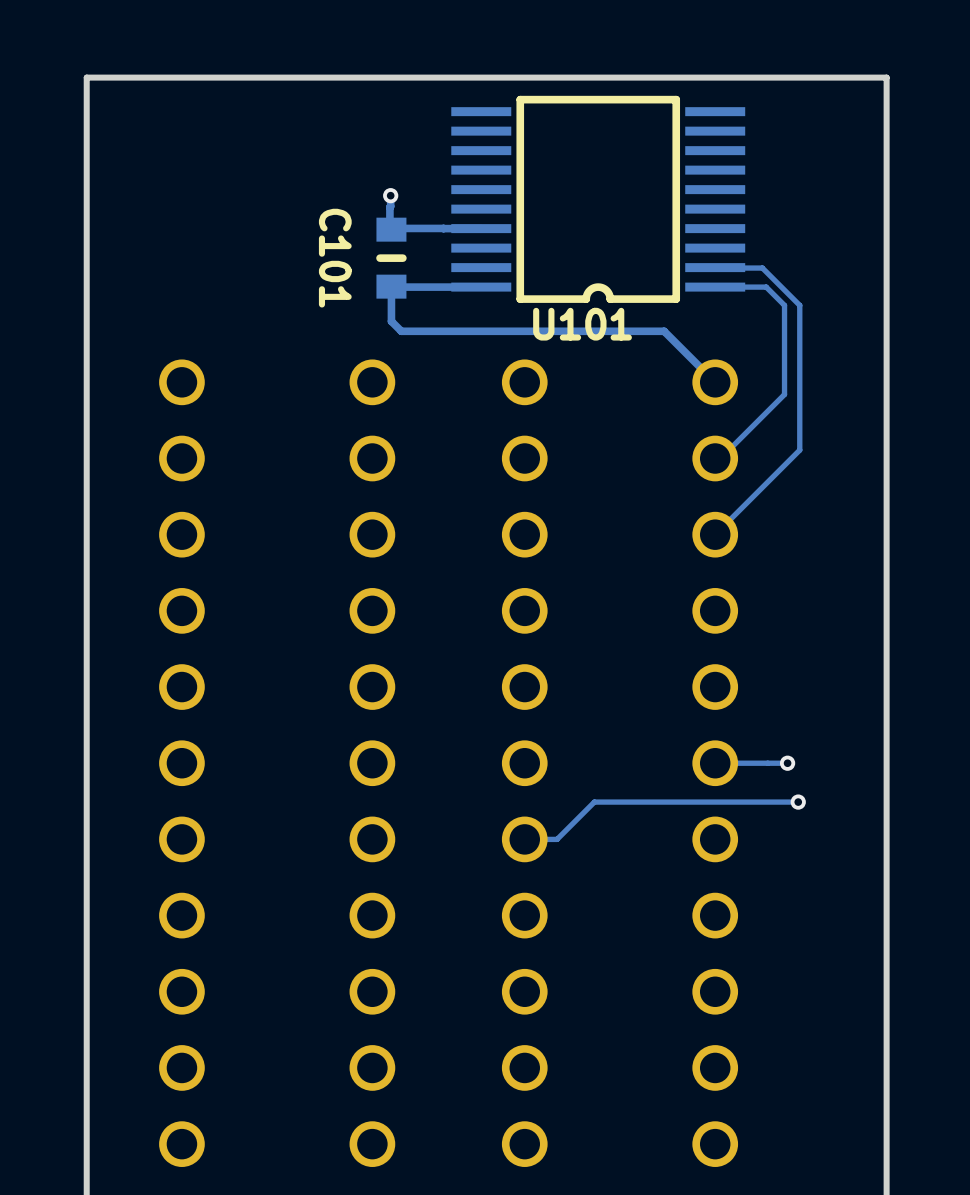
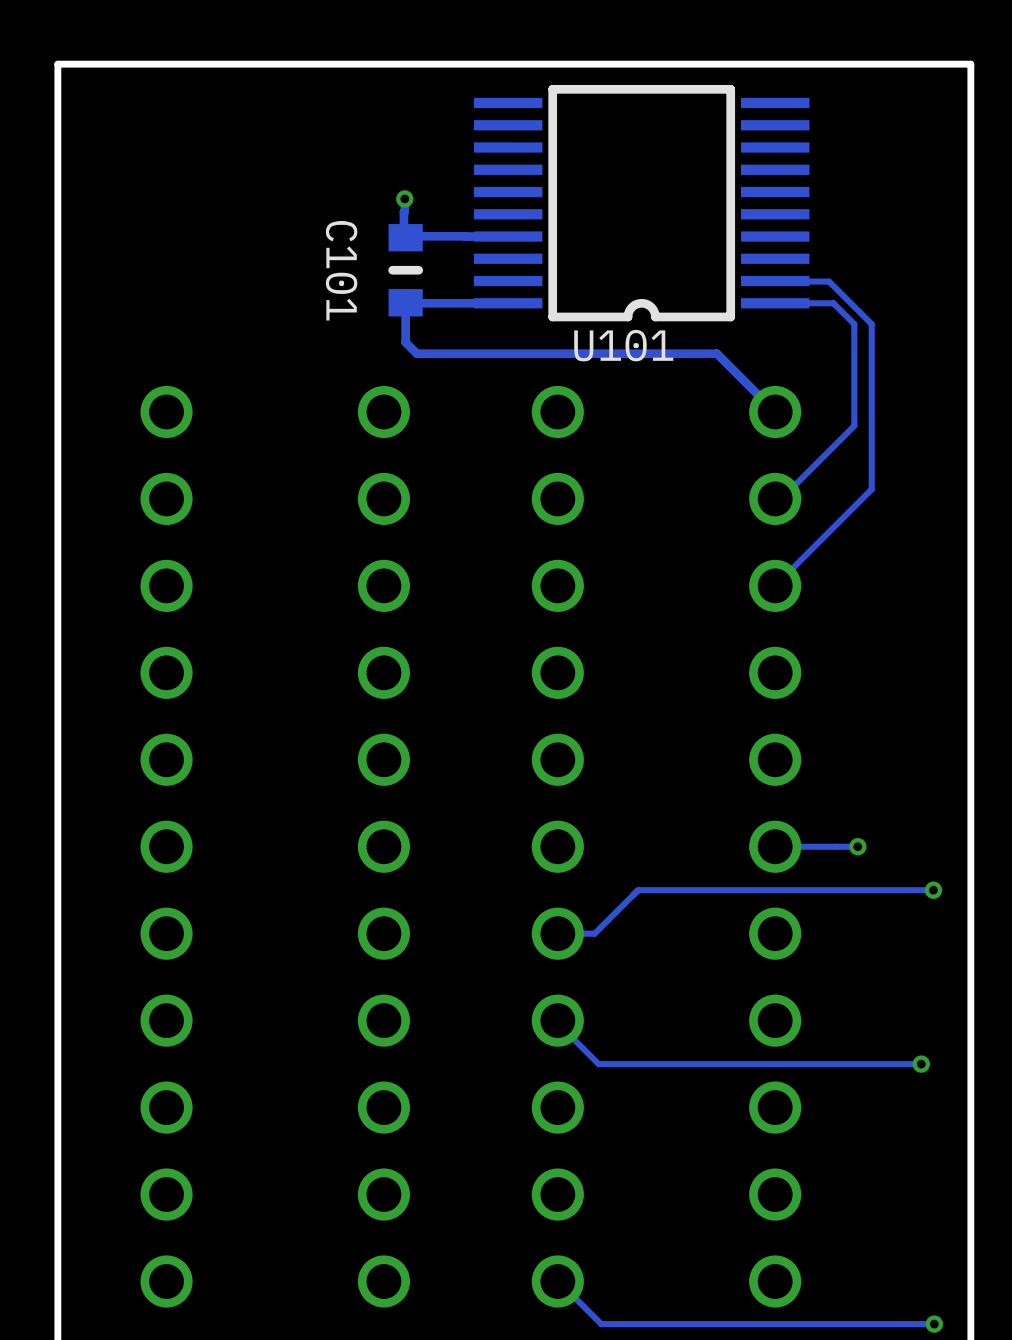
track: (798, 802) (594, 802) -> (933, 890) (637, 891)
via position: (798, 802) -> (933, 890)
track: none -> (559, 1024) (598, 1064) (921, 1064)
via: none -> (921, 1064)
track: none -> (559, 1282) (601, 1324) (934, 1324)
via: none -> (934, 1324)

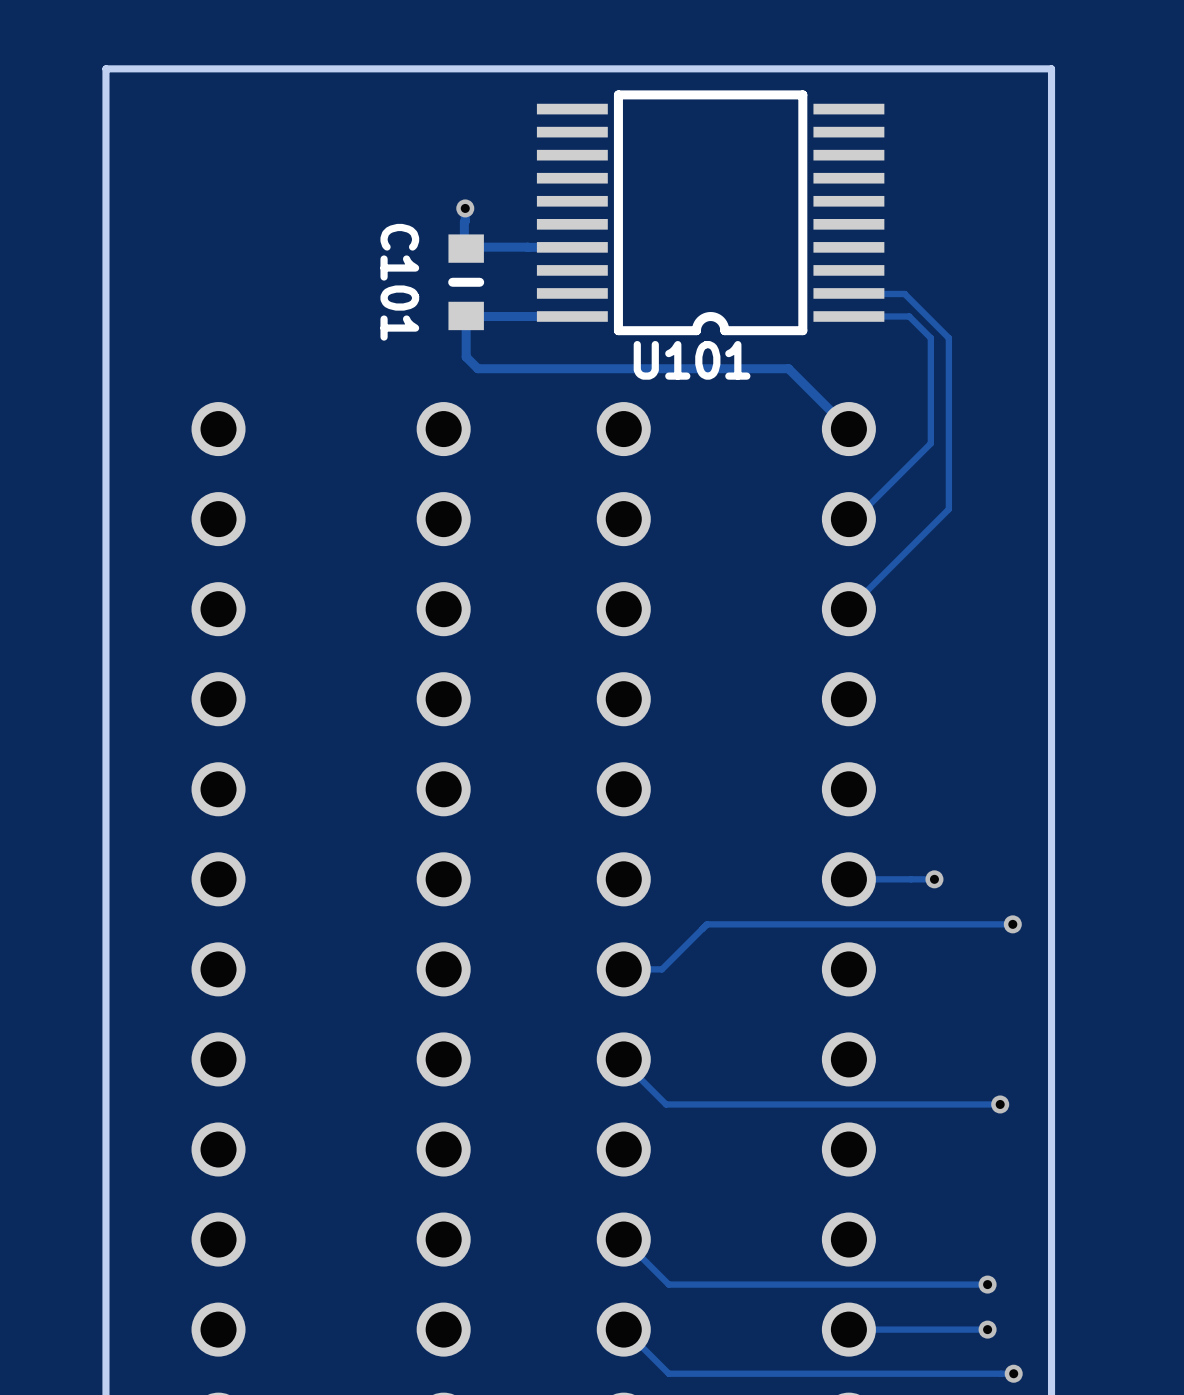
track: none -> (623, 1239) (668, 1284) (987, 1284)
via: none -> (987, 1284)
track: none -> (987, 1329) (848, 1329)
via: none -> (987, 1329)

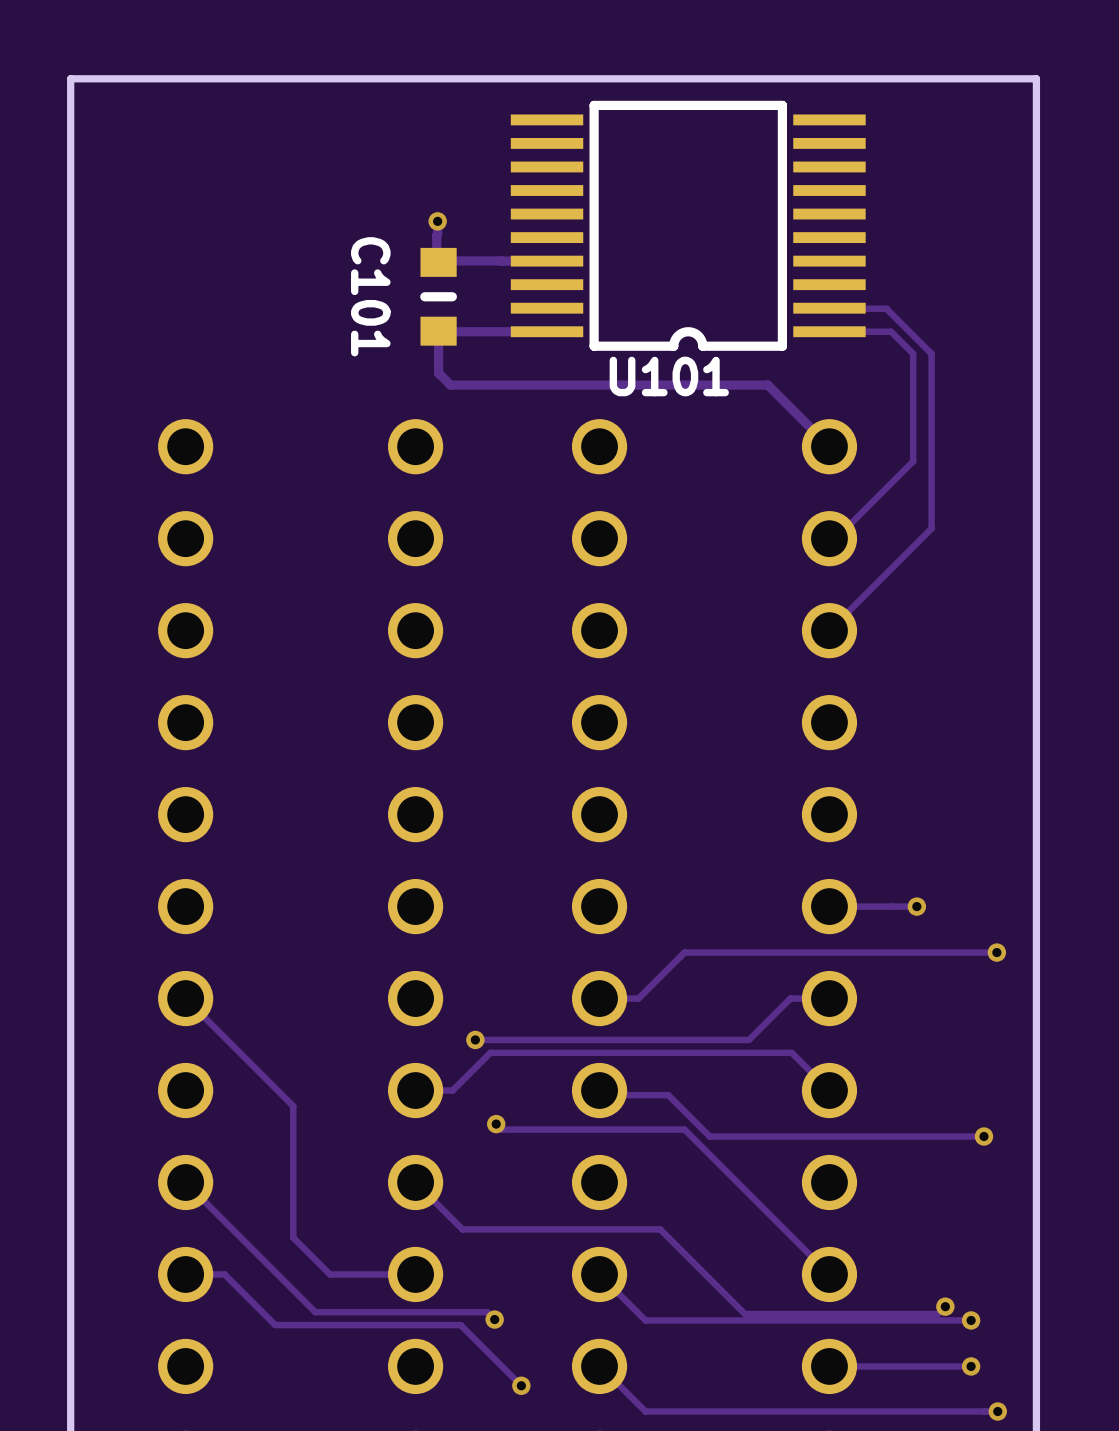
track: none -> (185, 998) (293, 1106) (293, 1237) (330, 1274) (415, 1274)
track: none -> (829, 998) (790, 998) (749, 1039) (475, 1039)
via: none -> (475, 1039)
track: none -> (829, 1090) (791, 1052) (490, 1052) (452, 1090) (415, 1090)
track: (625, 1063) (666, 1104) (731, 1104) -> (601, 1095) (668, 1095) (709, 1136)
track: none -> (496, 1124) (501, 1129) (684, 1129) (829, 1274)
via: none -> (496, 1124)
track: none -> (185, 1182) (315, 1312) (487, 1312) (494, 1319)
track: none -> (415, 1182) (462, 1229) (660, 1229) (744, 1314) (938, 1314) (945, 1306)
track: none -> (185, 1274) (224, 1274) (275, 1325) (460, 1325) (521, 1385)
via: none -> (945, 1306)
via: none -> (494, 1319)
via: none -> (521, 1385)

